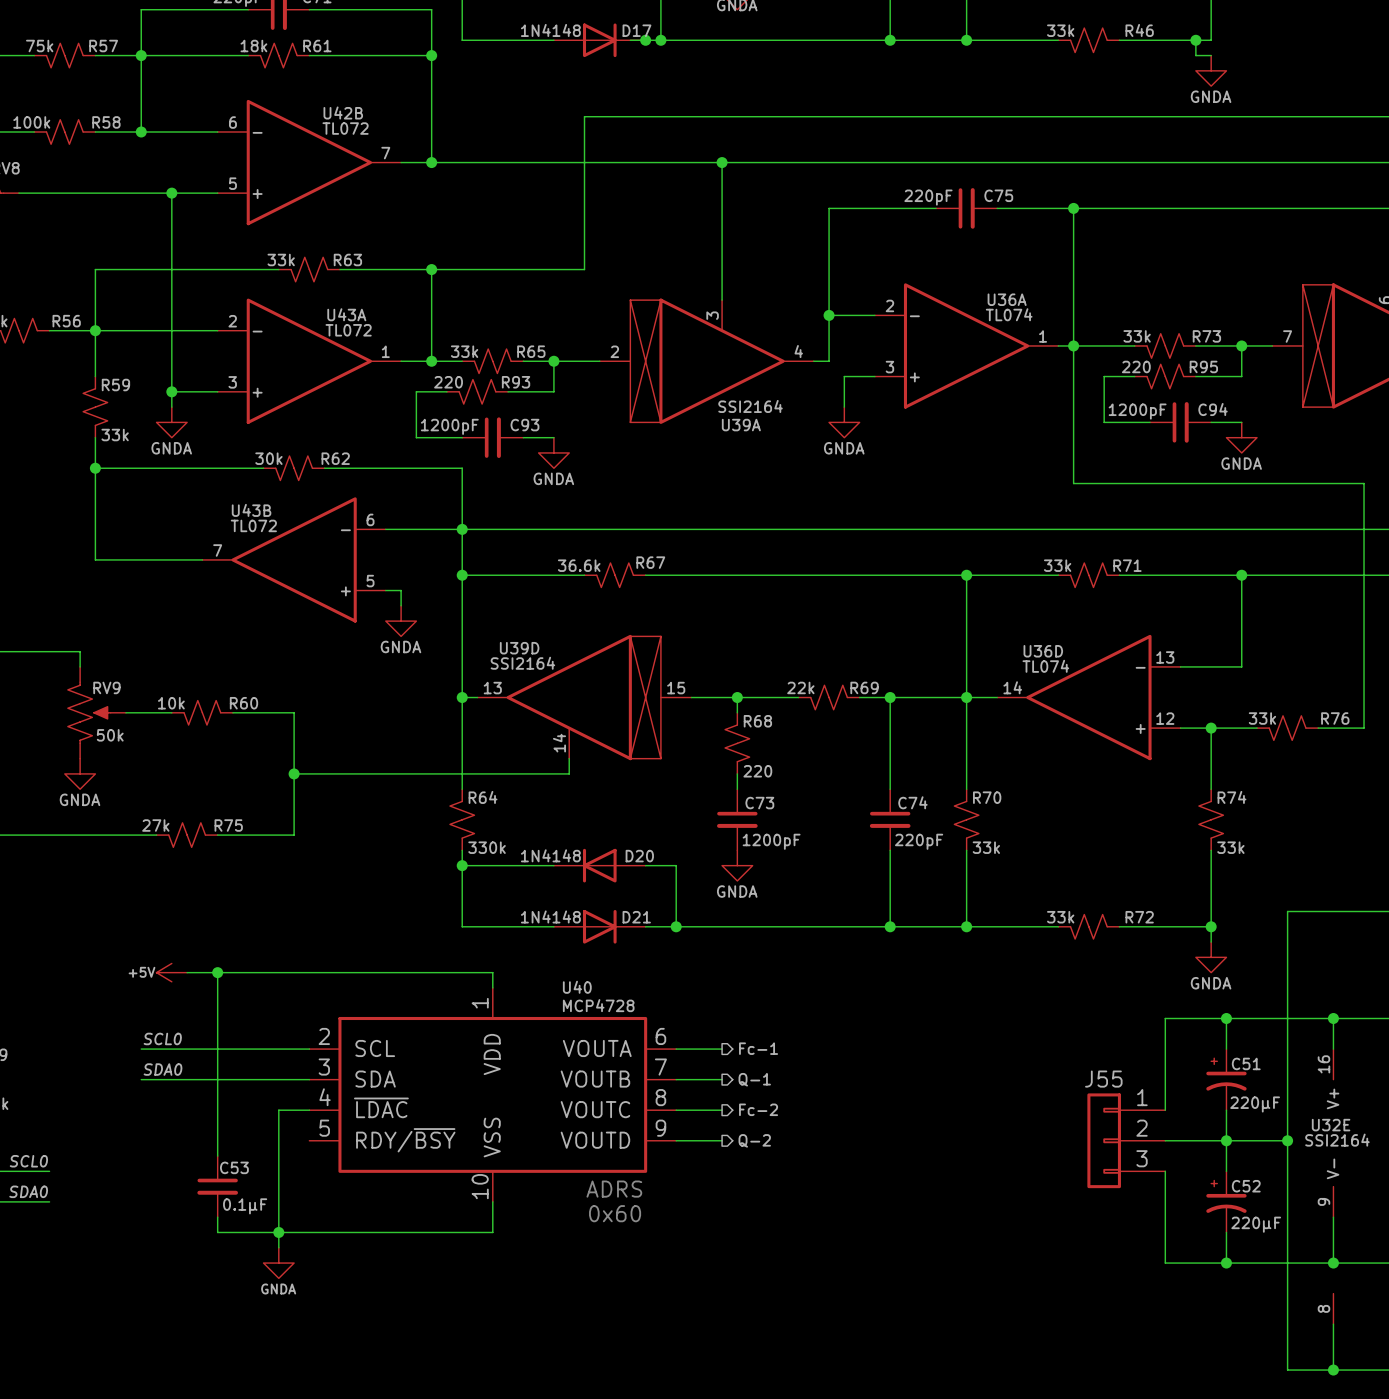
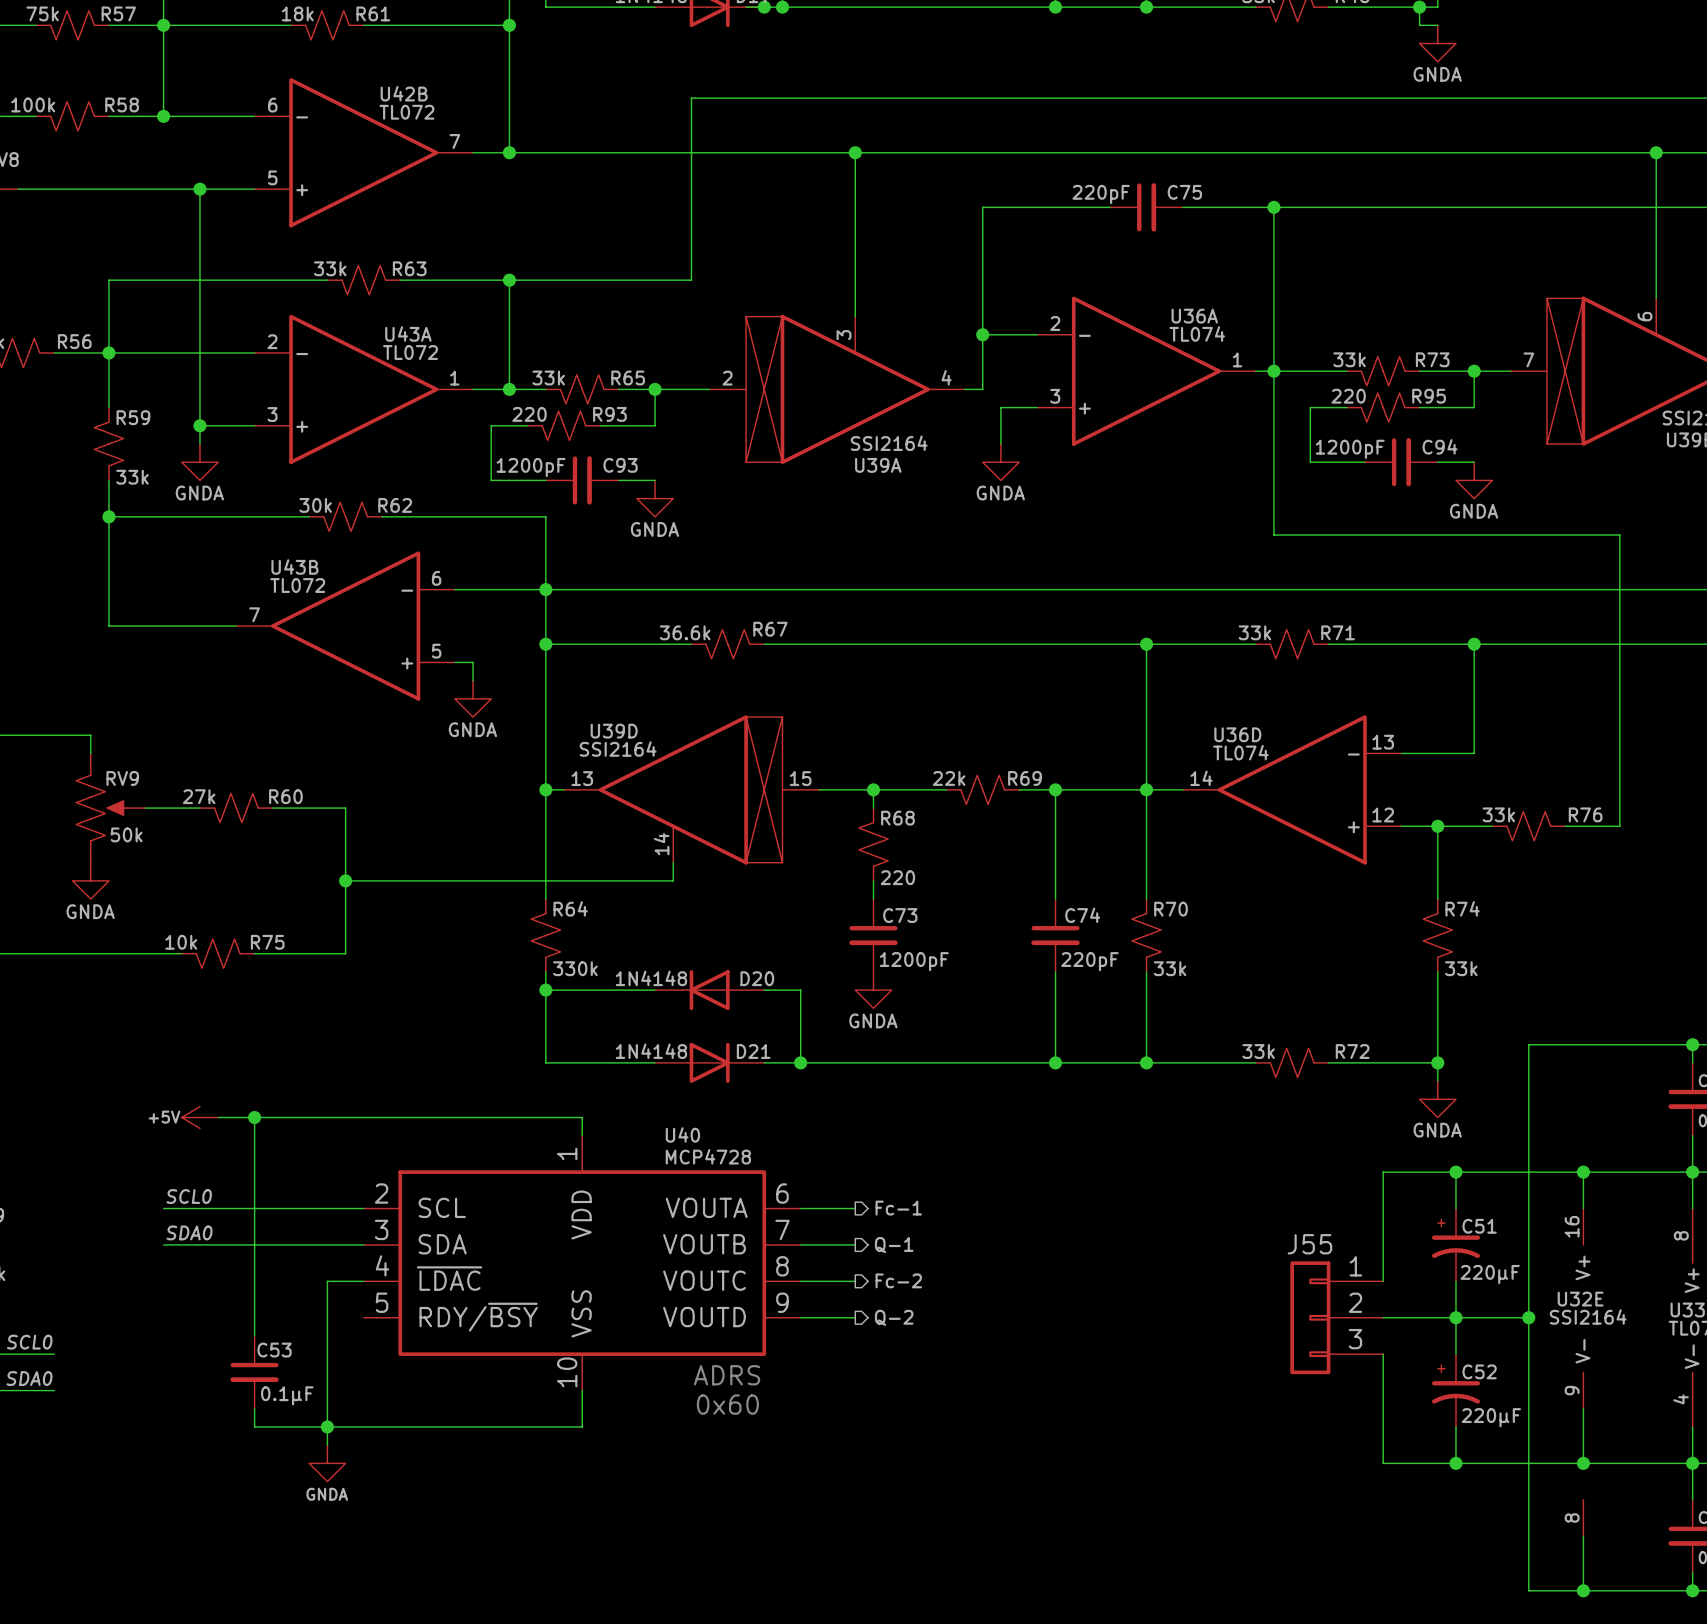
R60 value: 10k (171, 703) -> 27k (199, 796)
R75 value: 27k (155, 825) -> 10k (181, 942)

